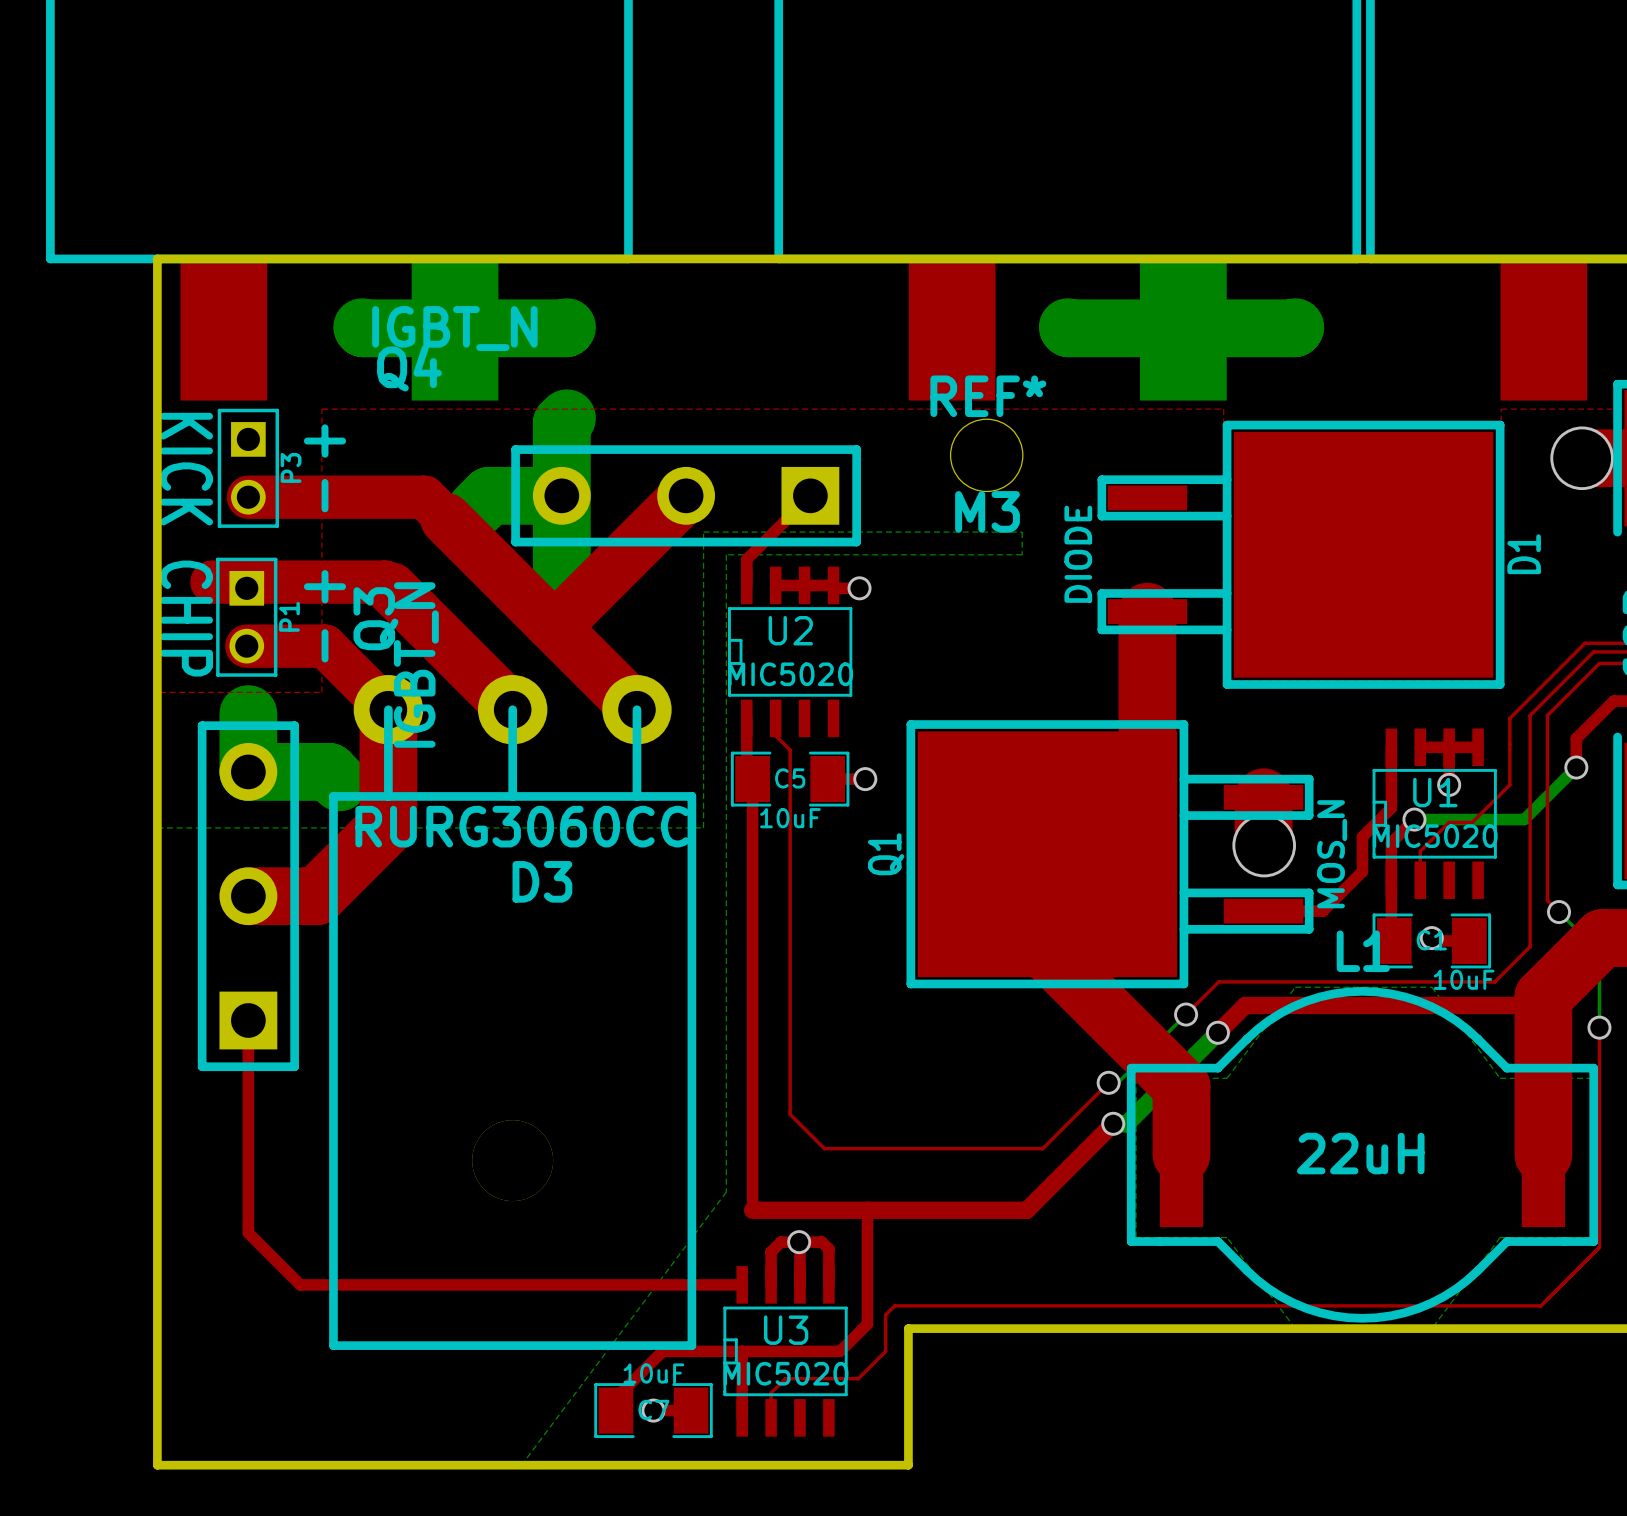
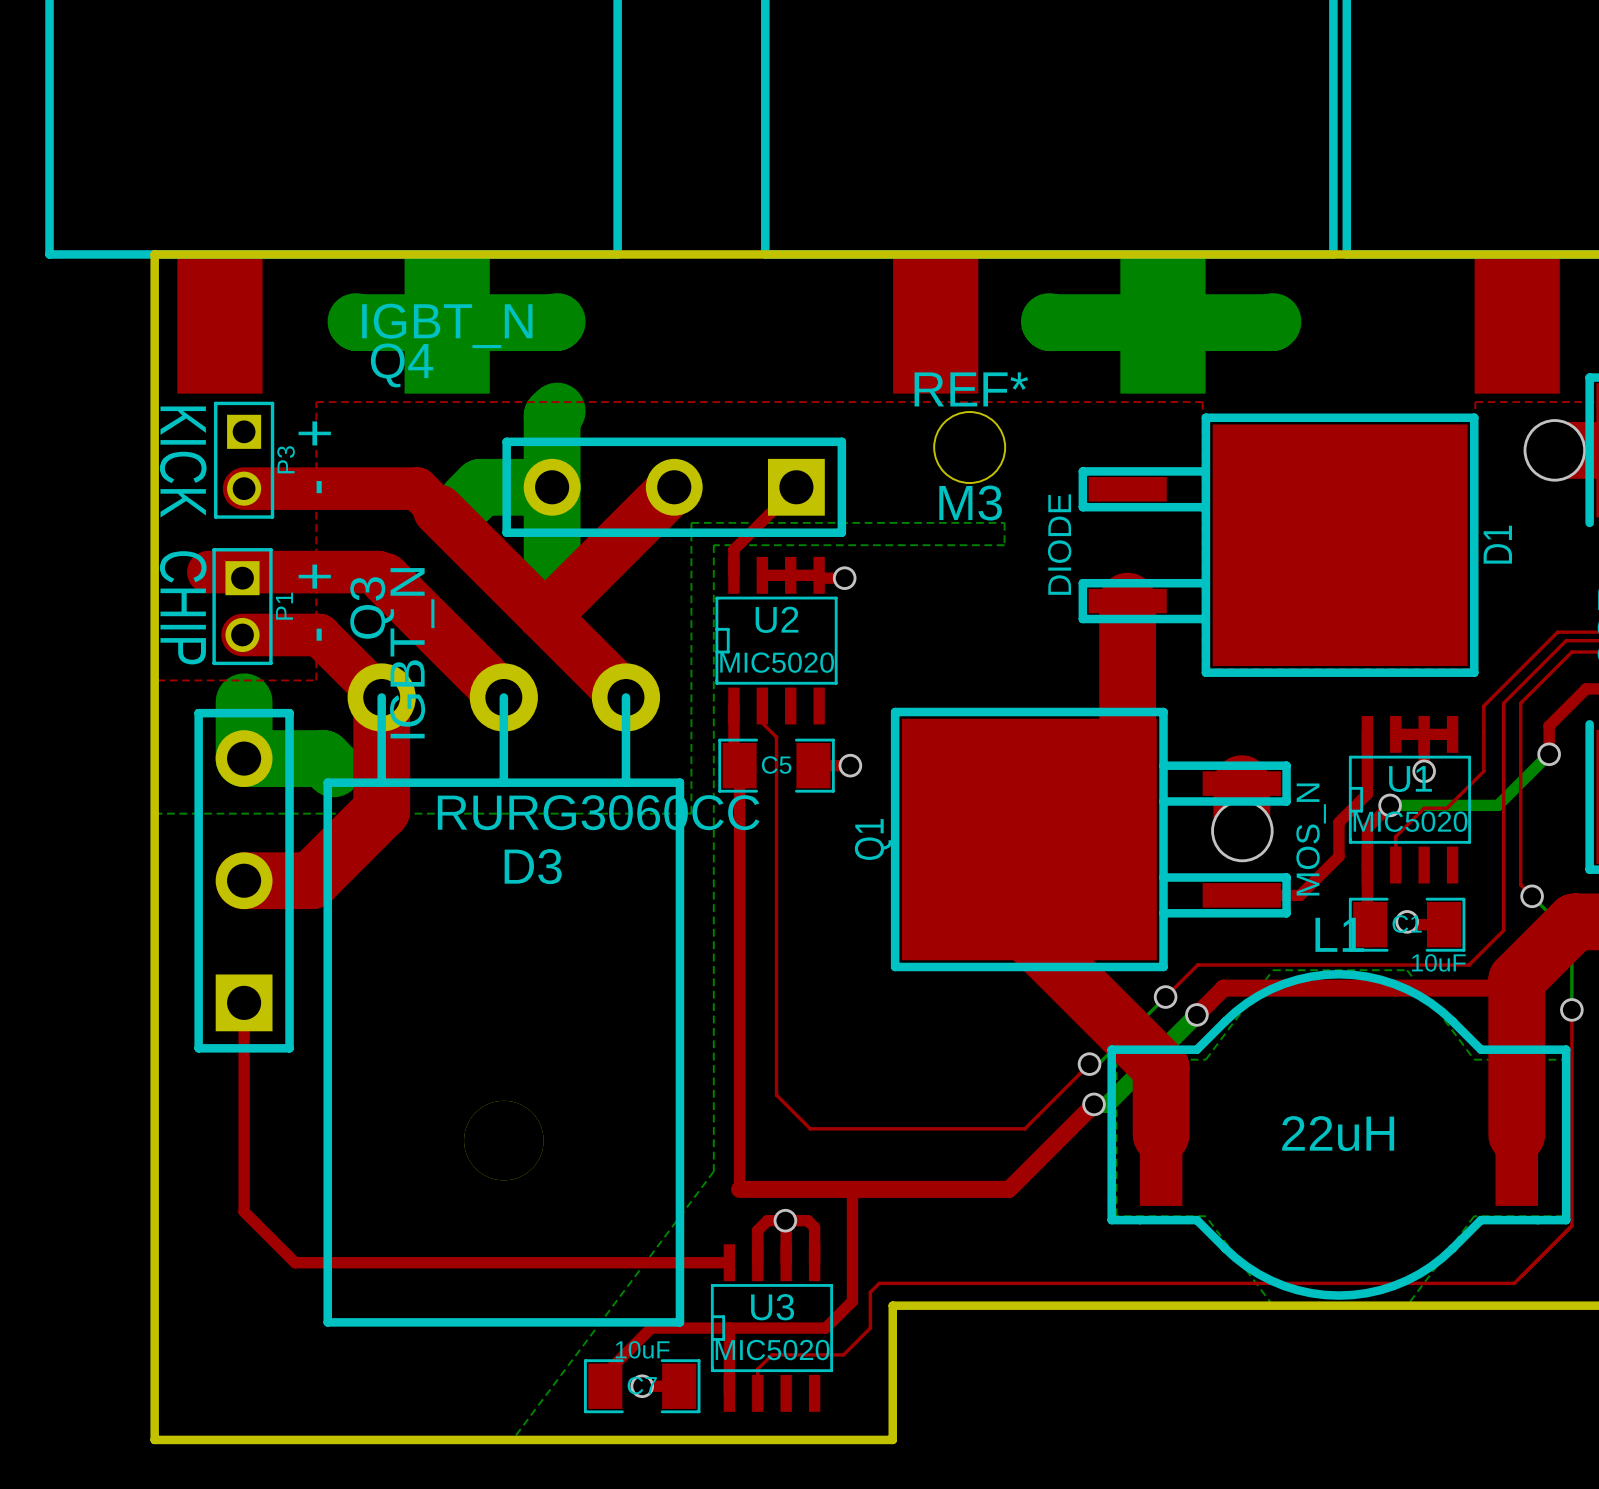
C5 value: 10uF (790, 818) -> none
D3 value position: RURG3060CC (522, 826) -> RURG3060CC (598, 812)

